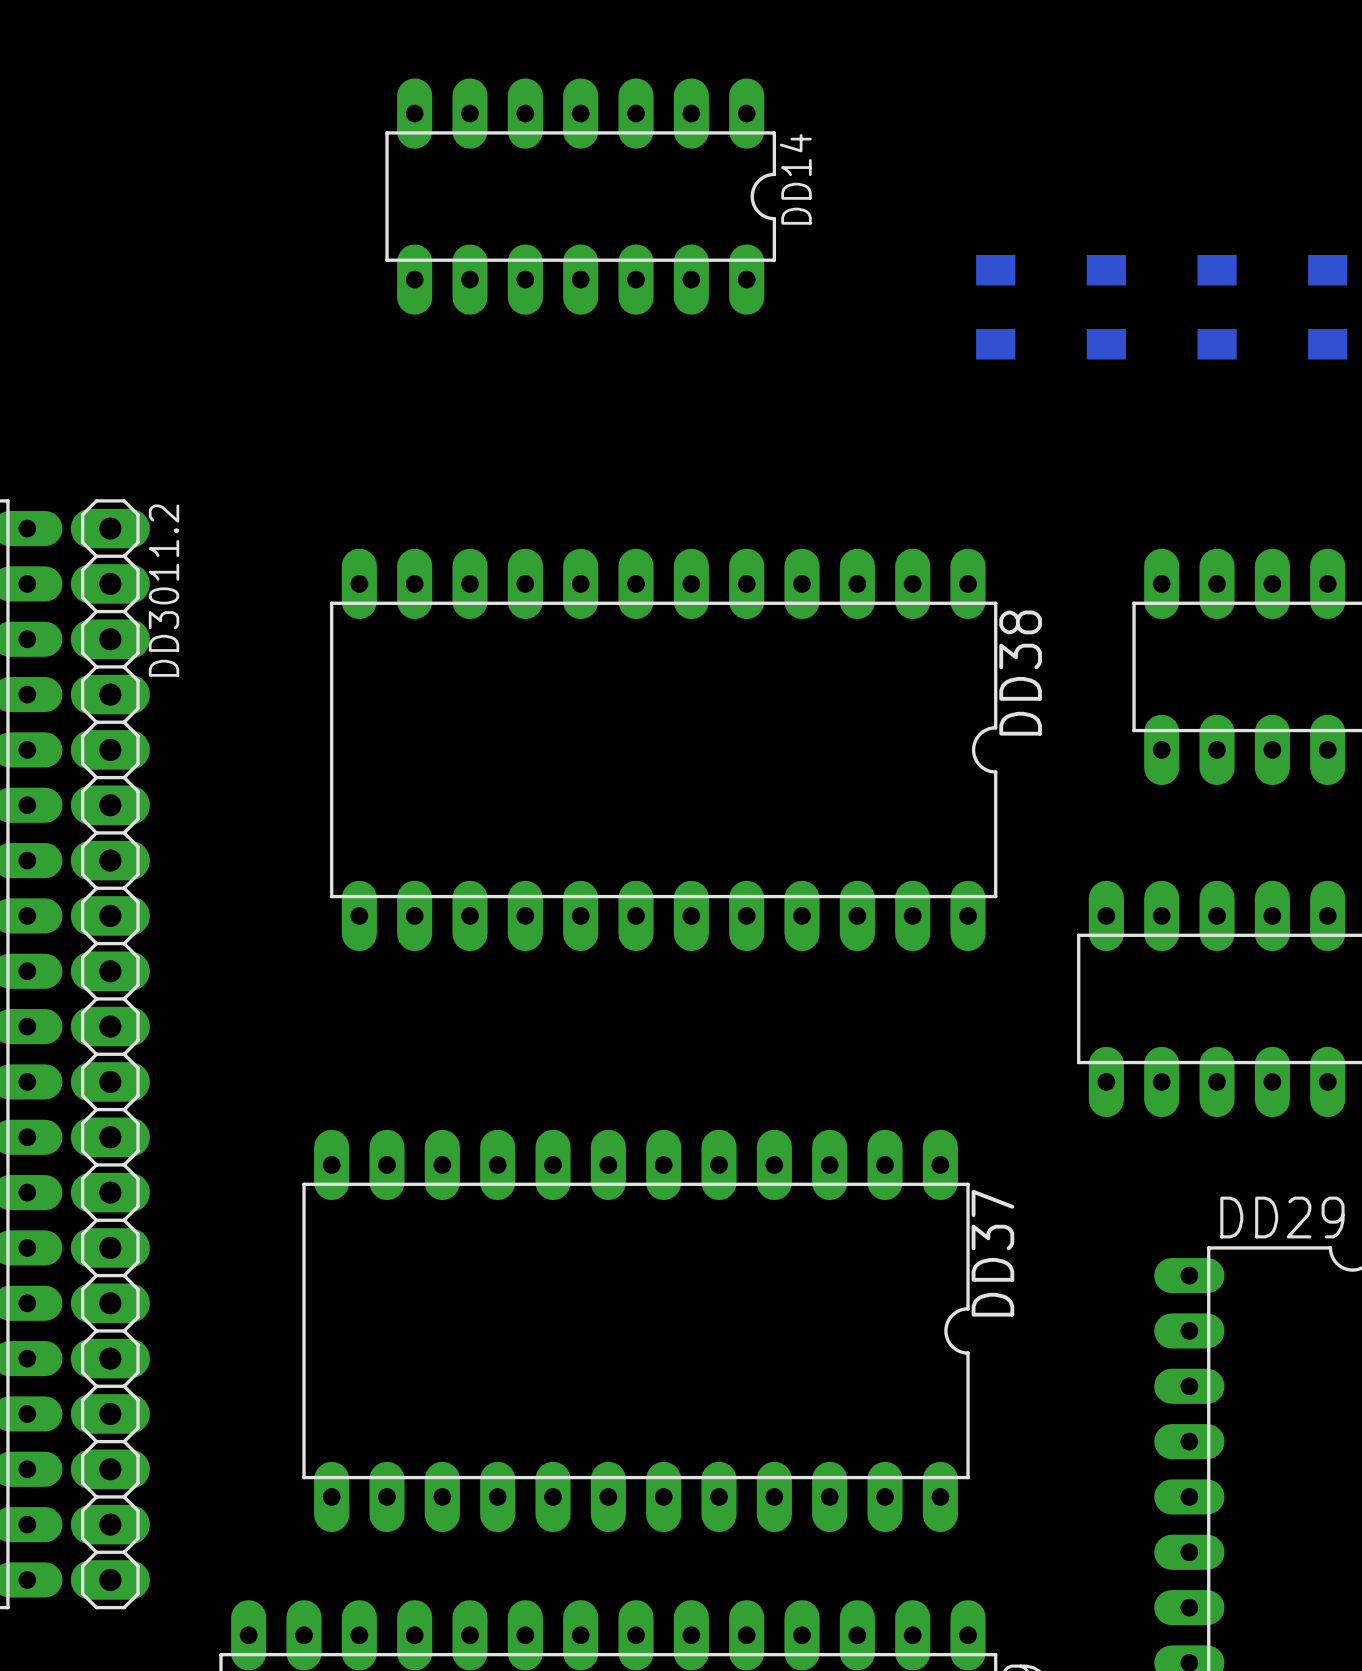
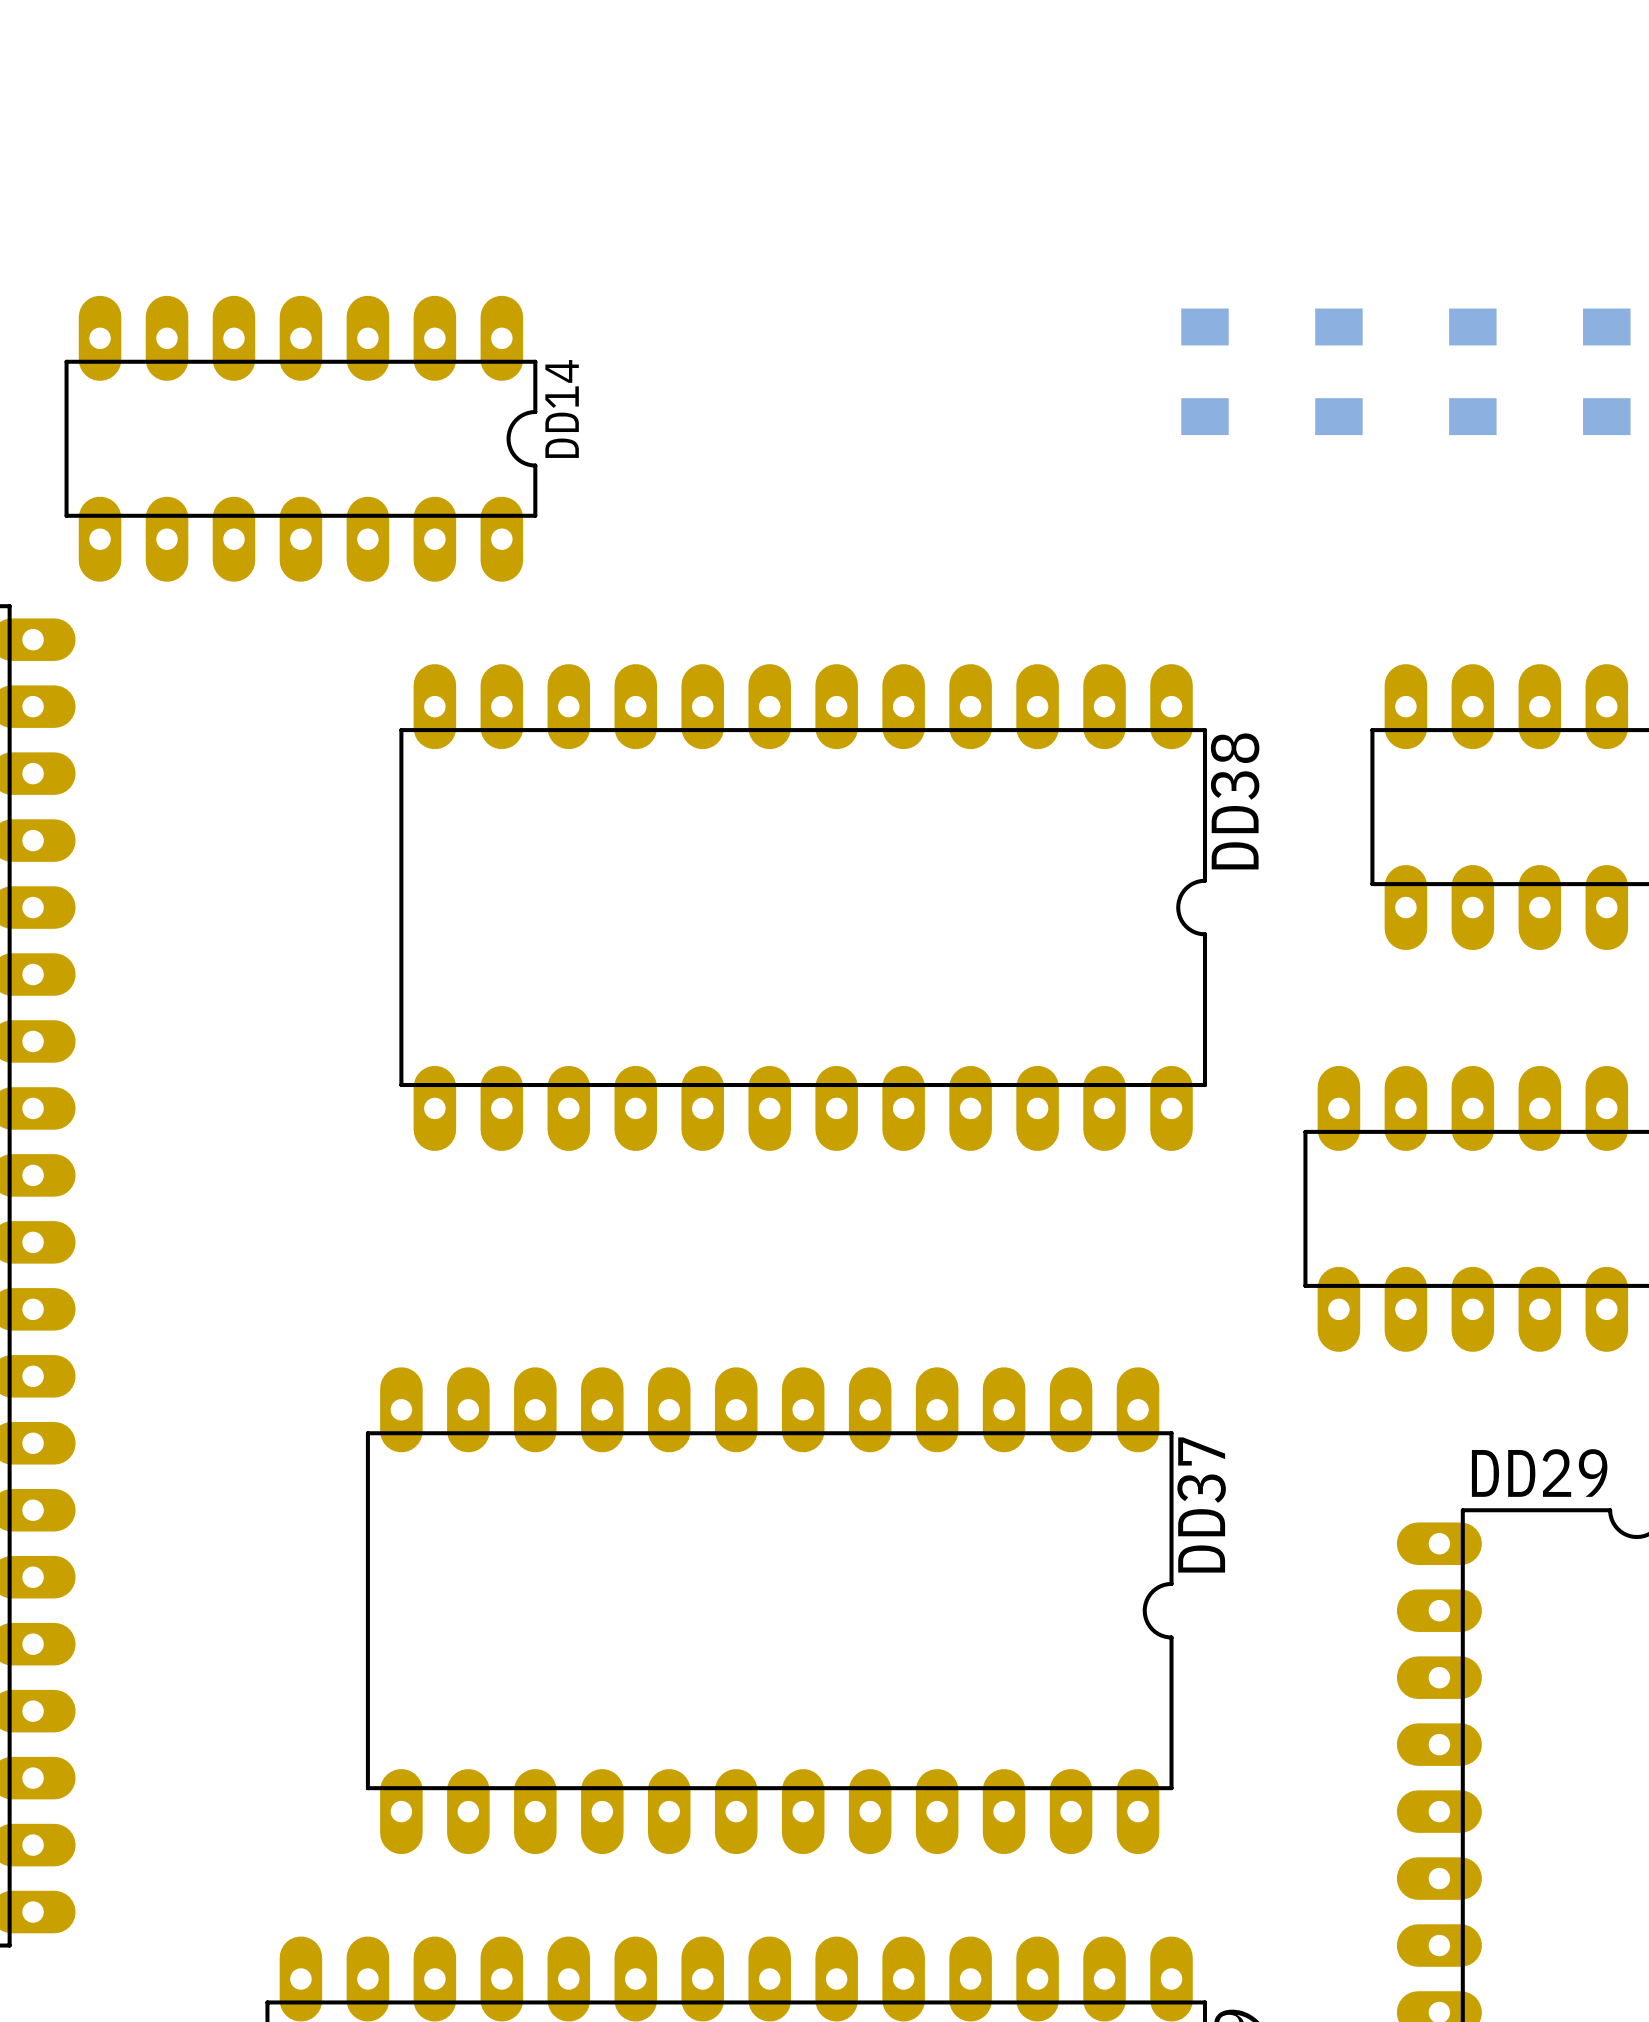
DD14 position: (580, 196) -> (300, 438)
DD3011.2: (110, 1054) -> none

